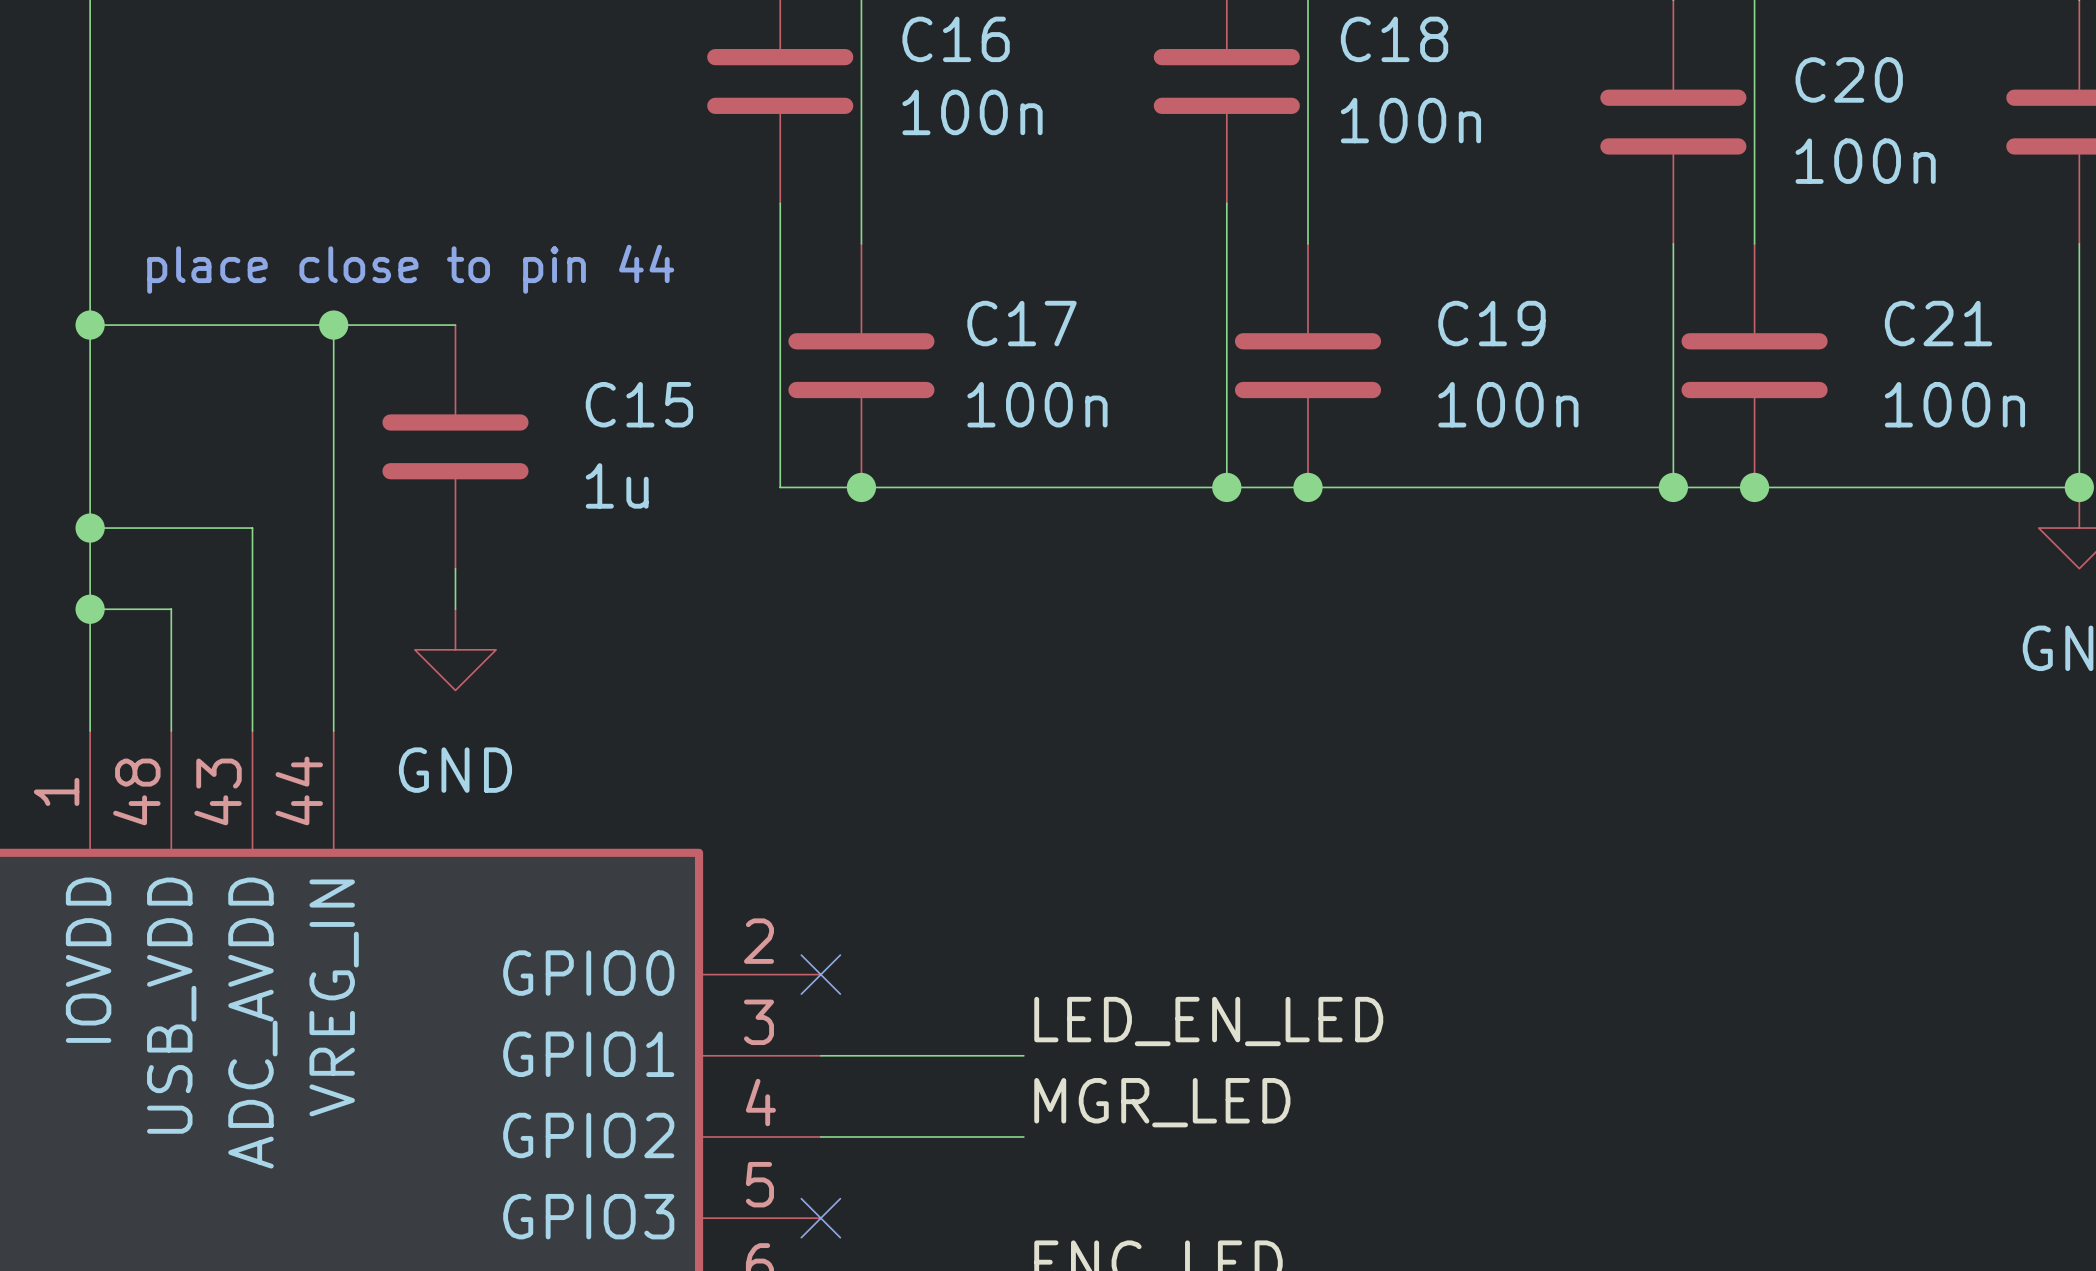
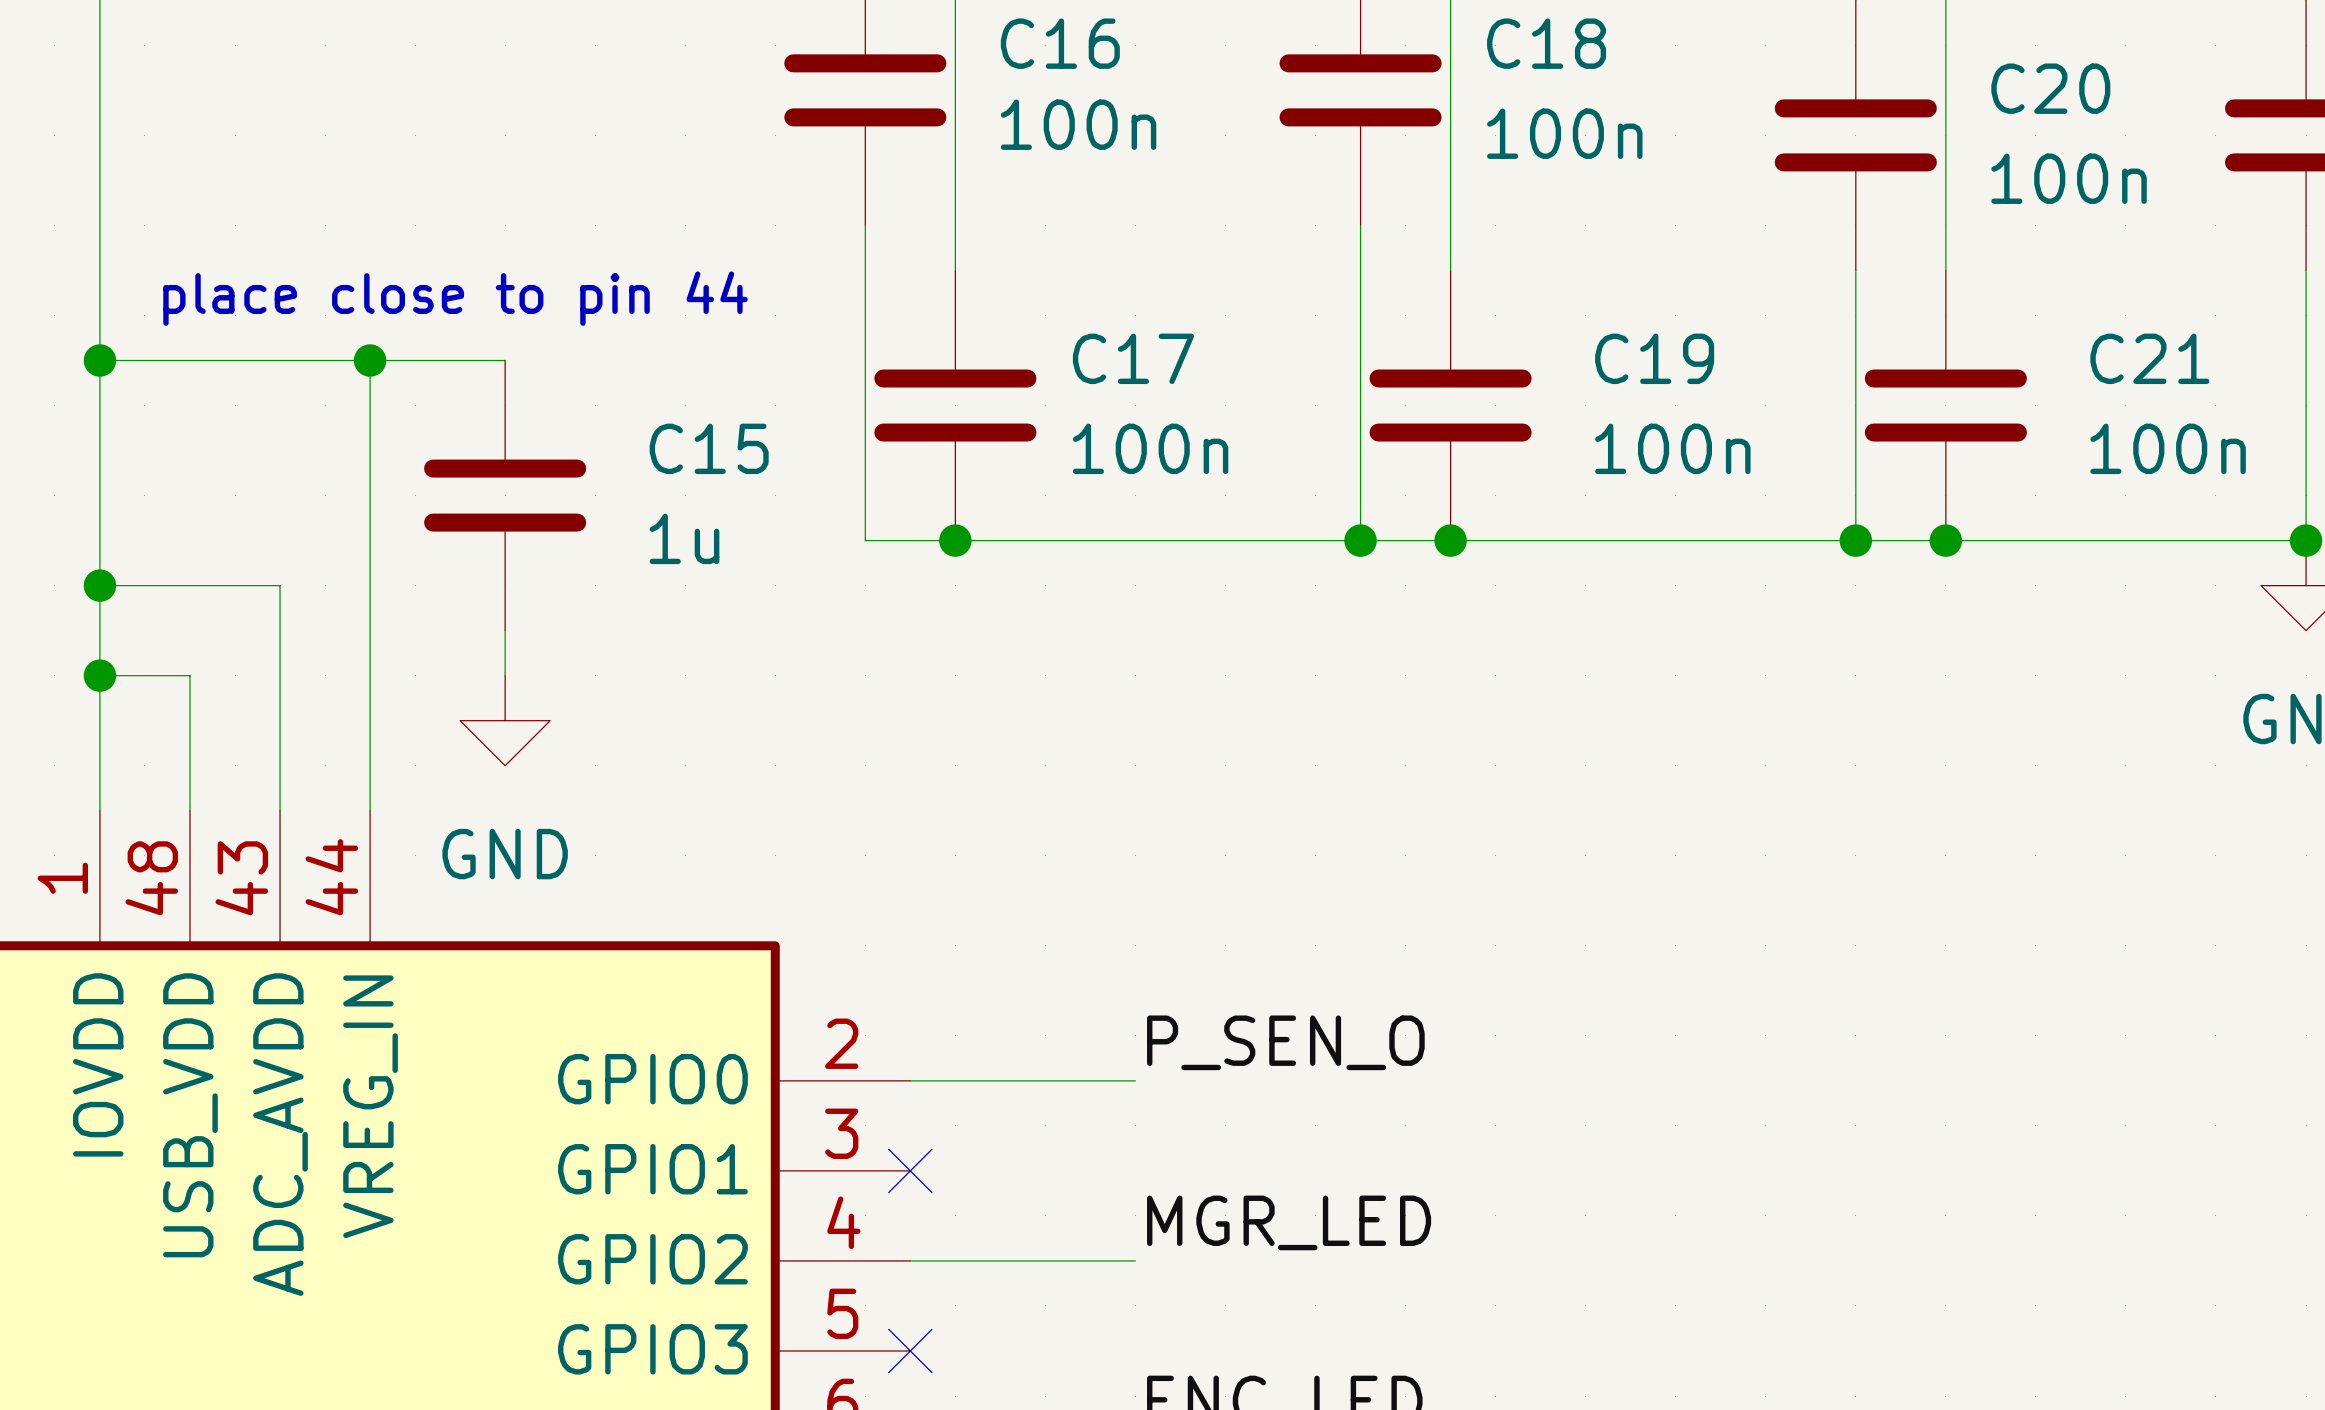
label: none -> P_SEN_O (1285, 1042)
no-connect mark position: (820, 974) -> (910, 1170)
label: LED_EN_LED (1208, 1021) -> none
wire: (820, 1055) (1023, 1055) -> (910, 1080) (1135, 1080)

